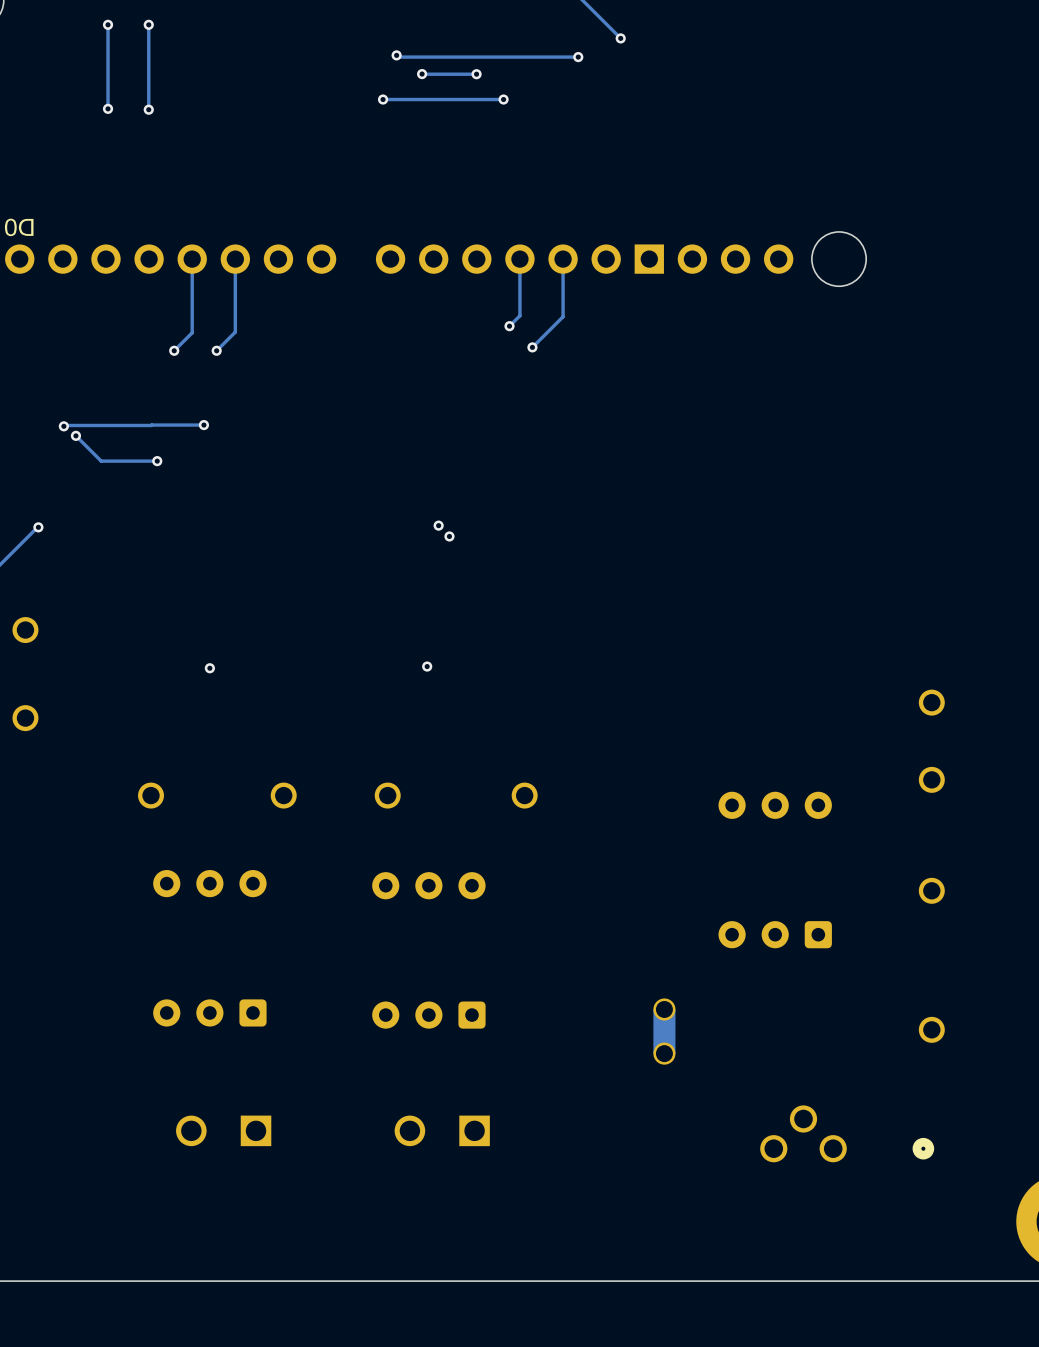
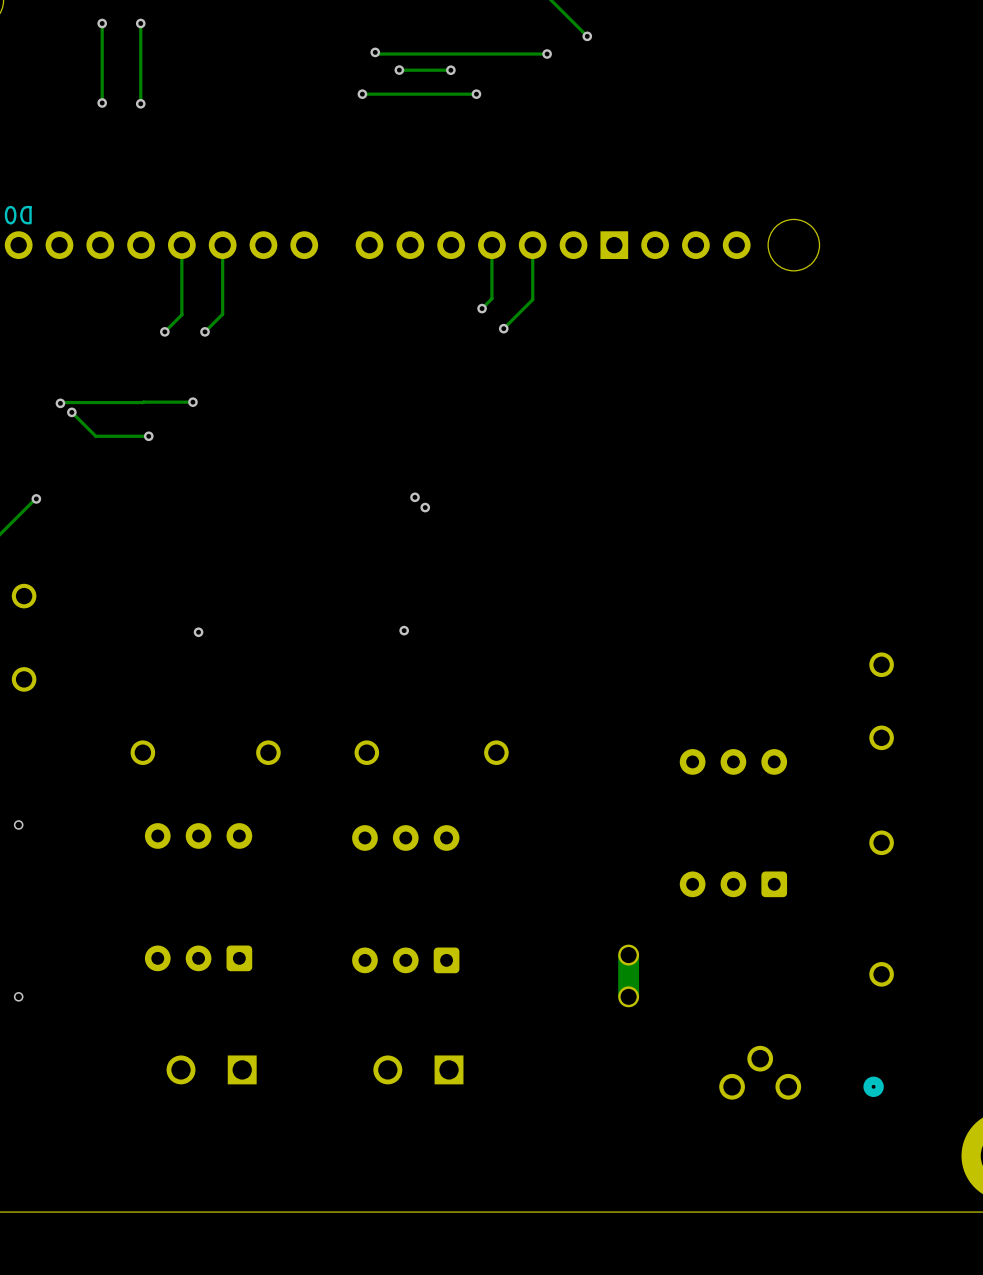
via: none -> (18, 824)
via: none -> (18, 996)

